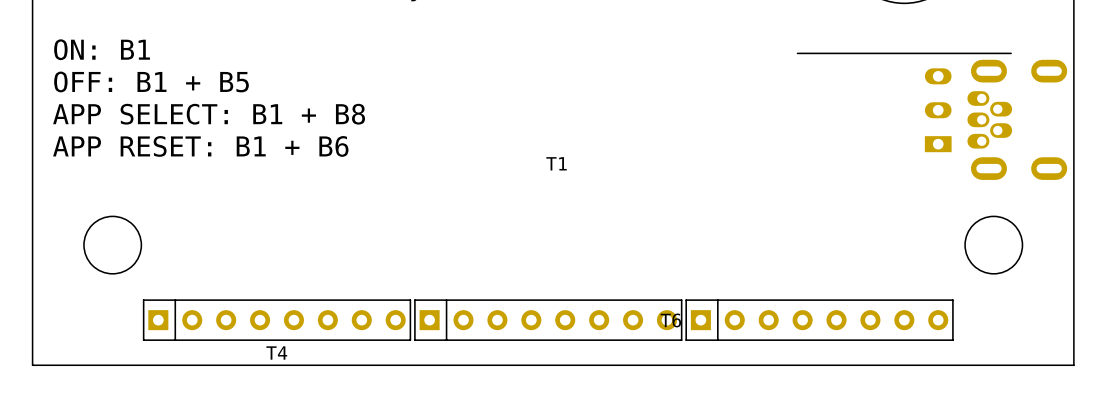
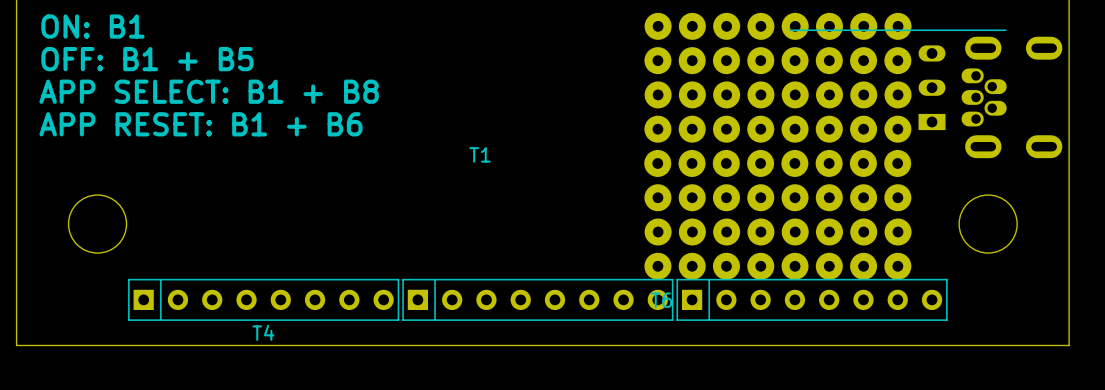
T1 name position: T1 (556, 163) -> T1 (479, 154)
part: none -> (777, 146)

